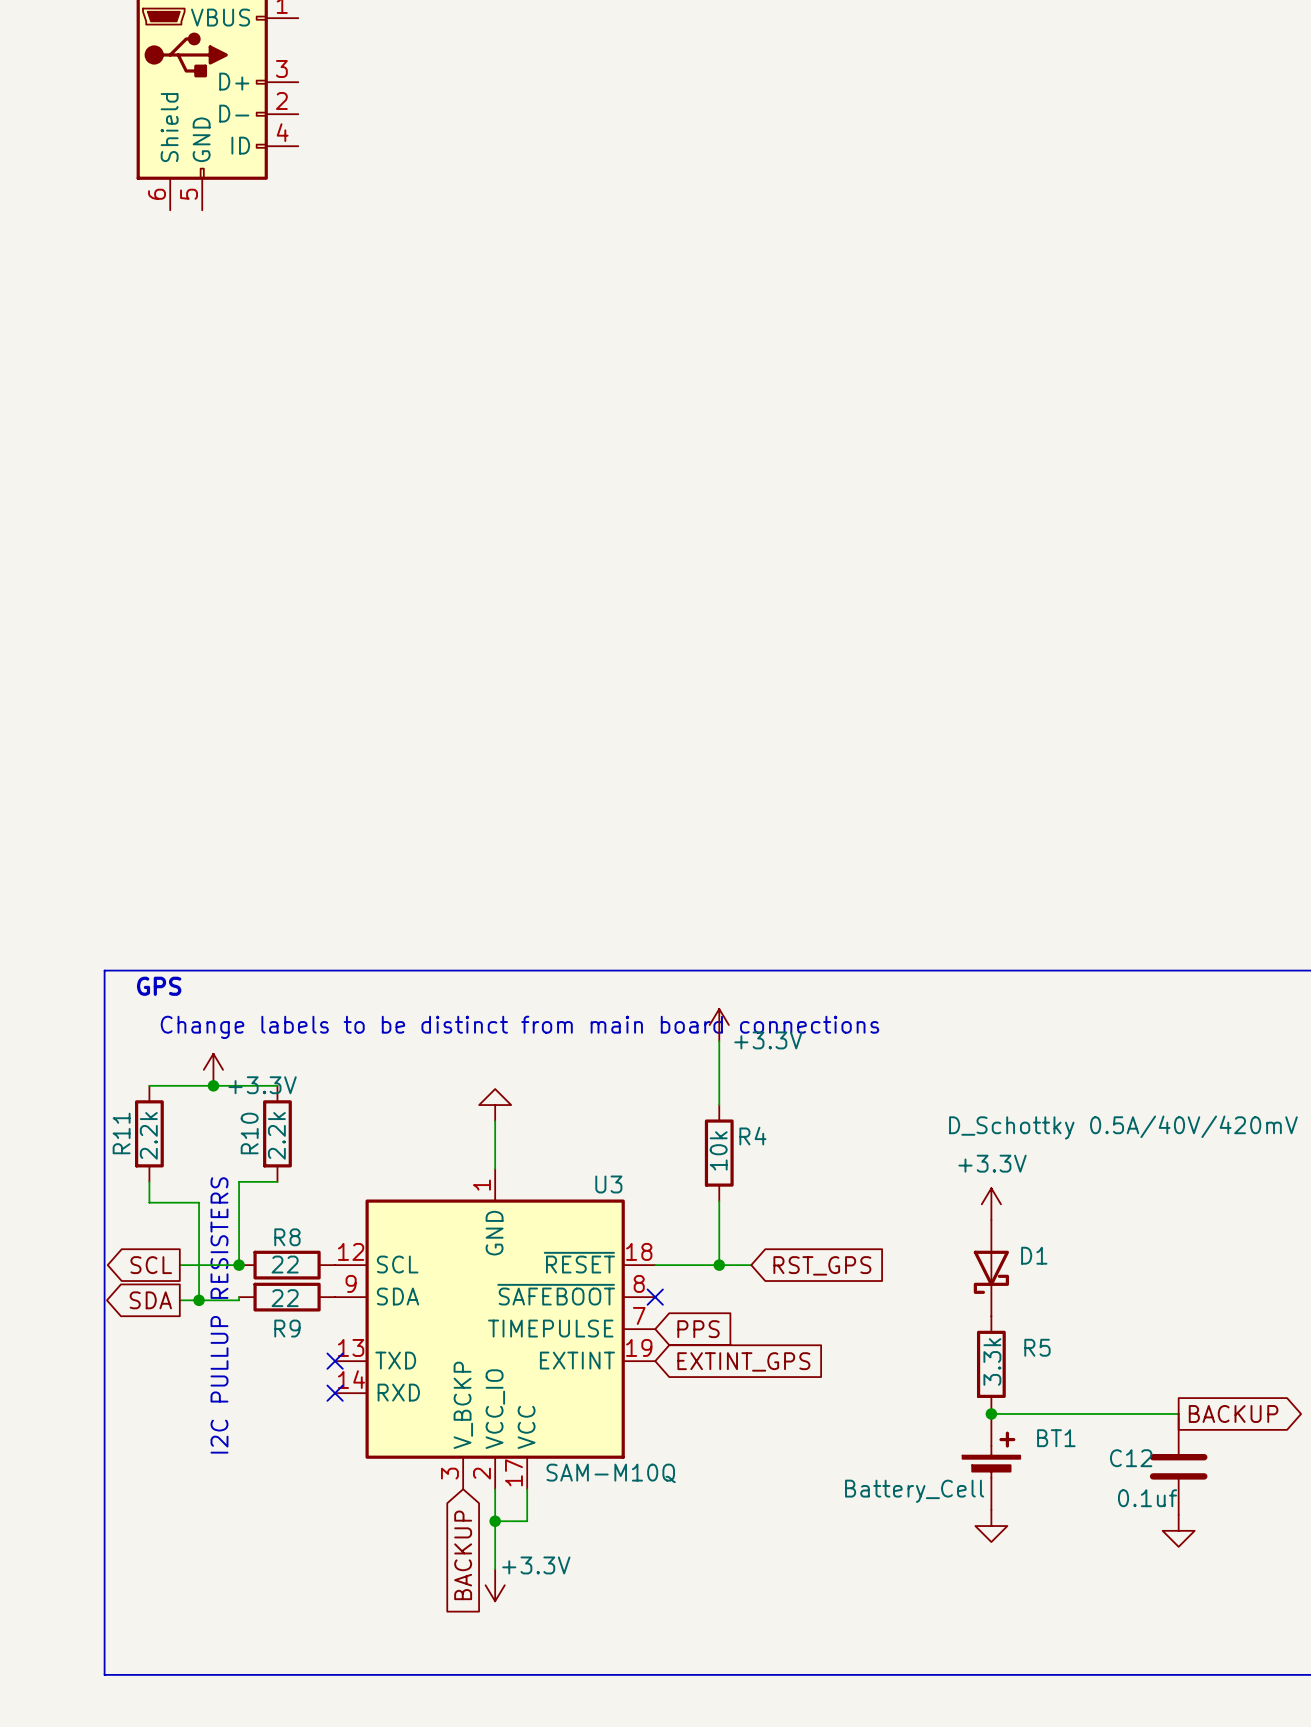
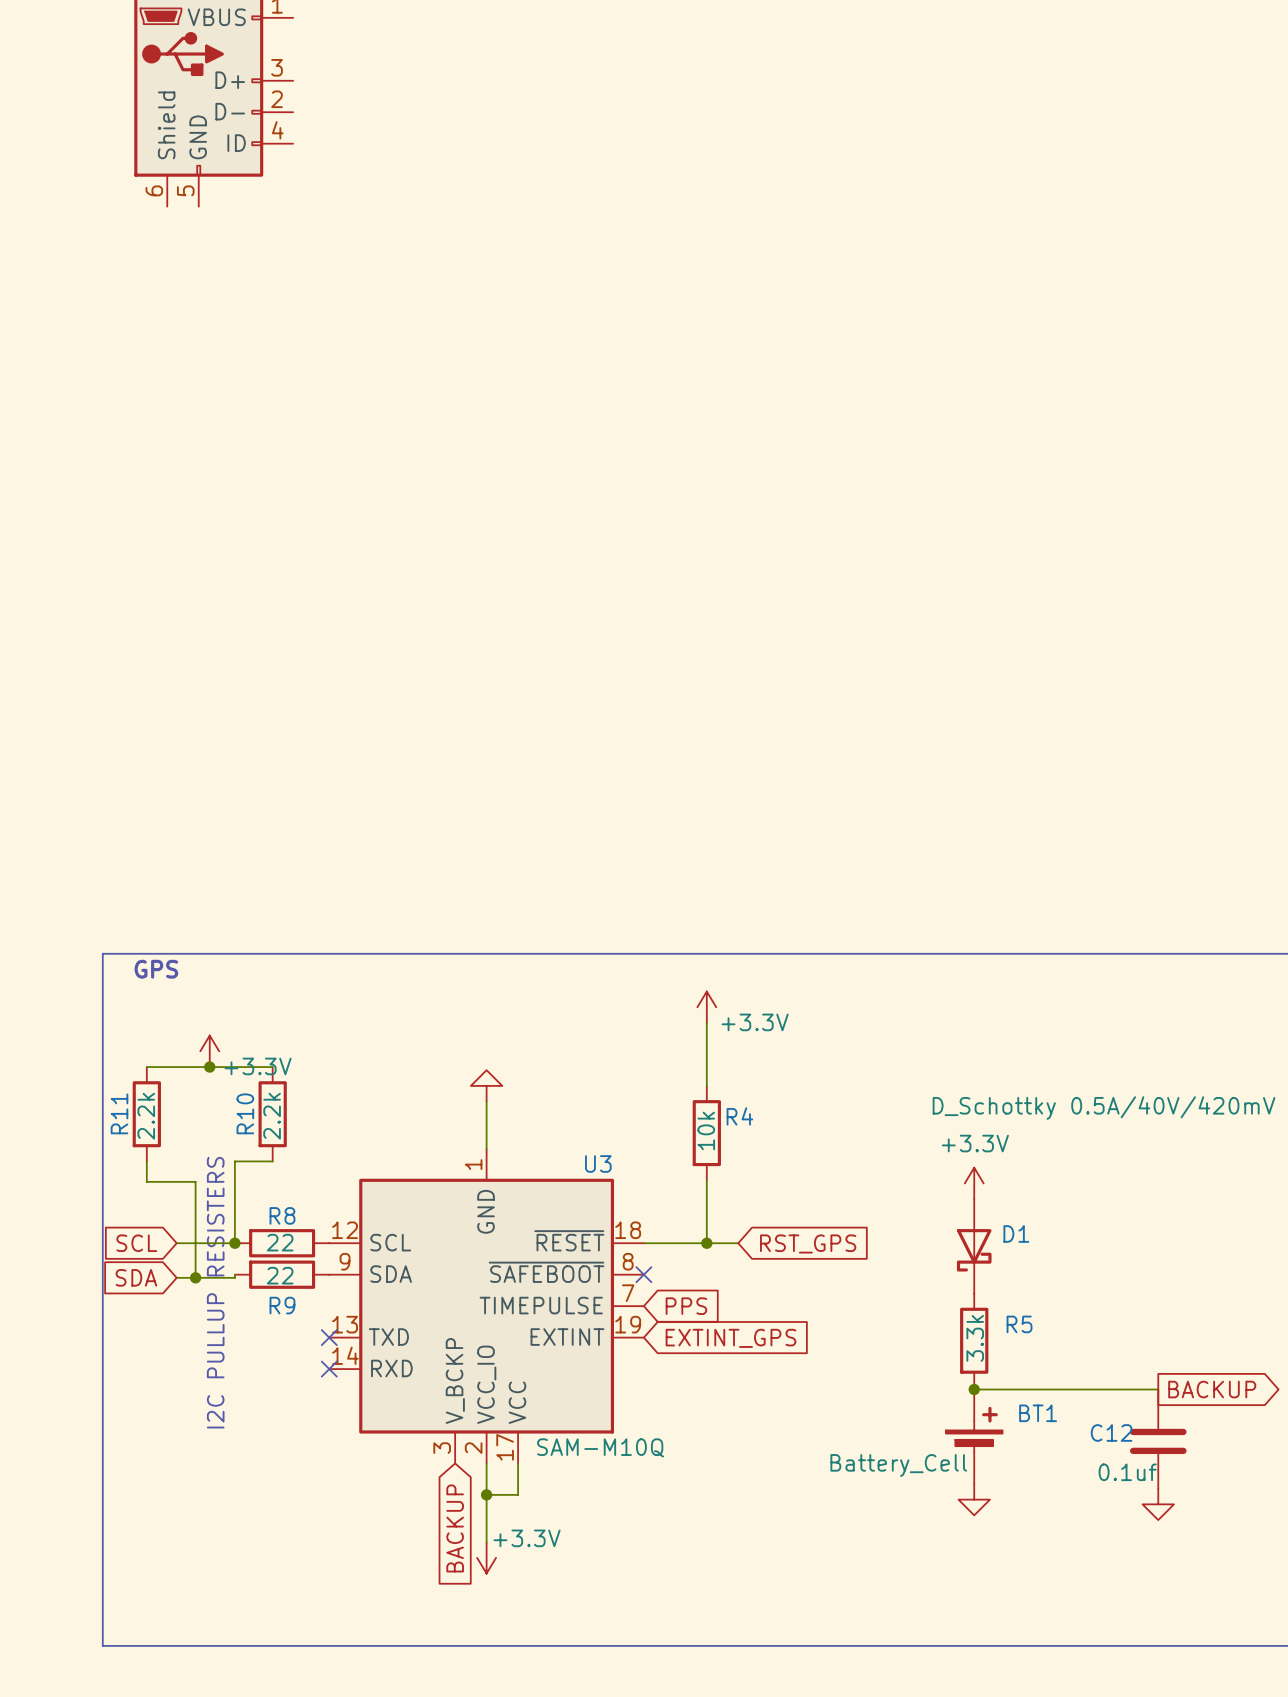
text: Change labels to be distinct from main board connections (519, 1027) -> none
global label shape: output (151, 1265) -> input (136, 1243)
global label shape: output (150, 1300) -> input (136, 1277)

